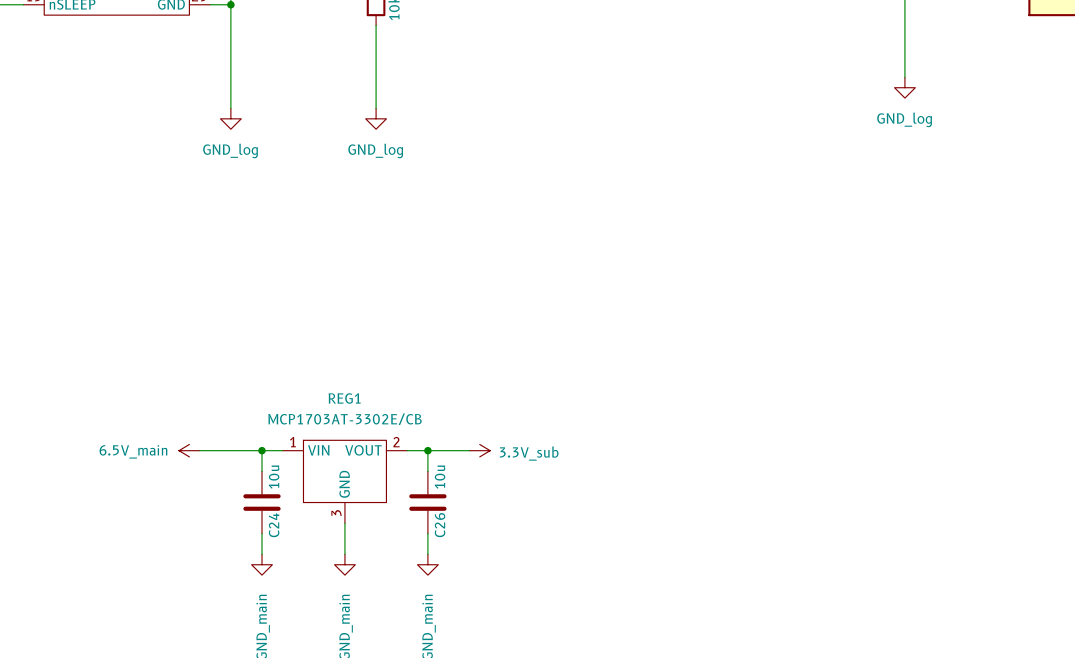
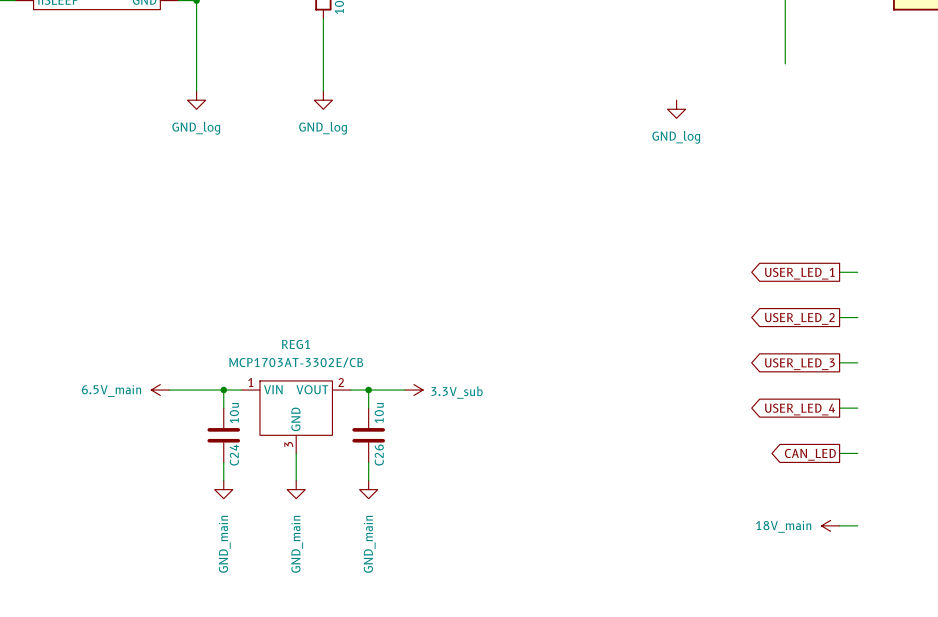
power symbol position: GND_log (904, 87) -> GND_log (676, 109)
wire: none -> (839, 272) (857, 272)
global label: none -> USER_LED_1 (799, 273)
wire: none -> (839, 317) (857, 317)
global label: none -> USER_LED_2 (799, 318)
wire: none -> (839, 362) (857, 362)
global label: none -> USER_LED_3 (799, 364)
wire: none -> (839, 408) (857, 408)
global label: none -> USER_LED_4 (800, 409)
wire: none -> (839, 453) (857, 453)
global label: none -> CAN_LED (810, 454)
power symbol: none -> 18V_main (830, 525)
wire: none -> (839, 525) (857, 525)

